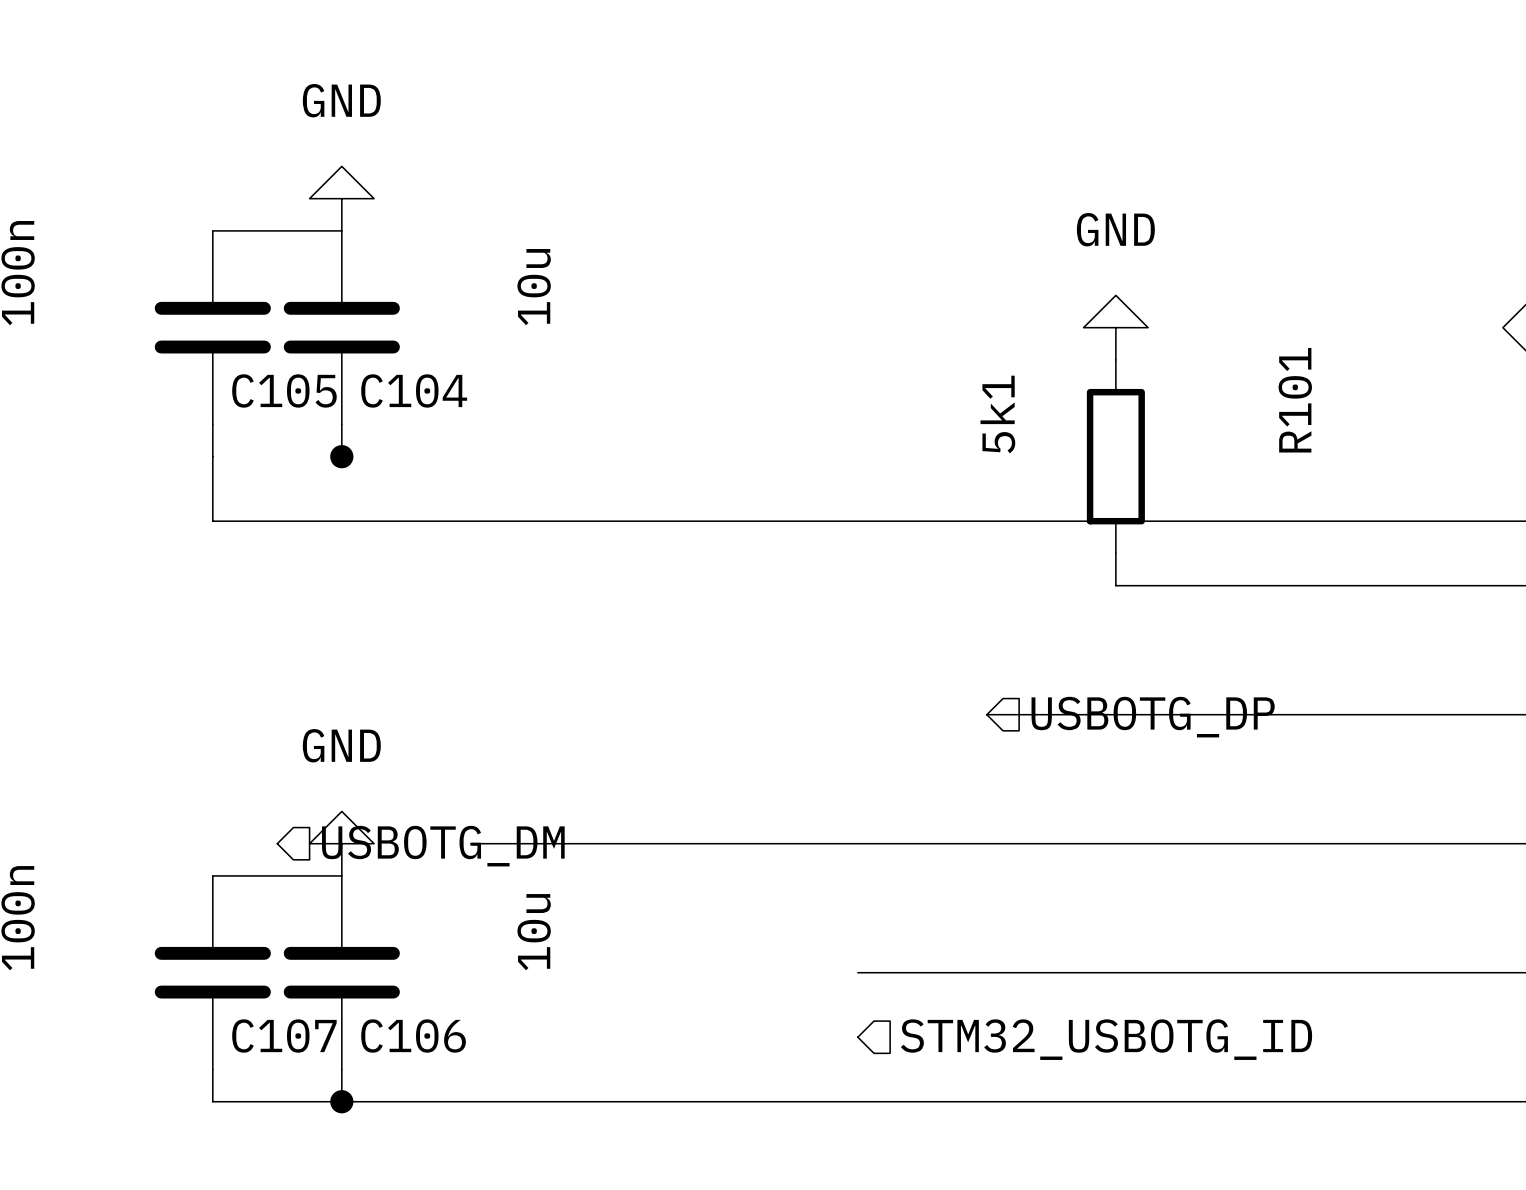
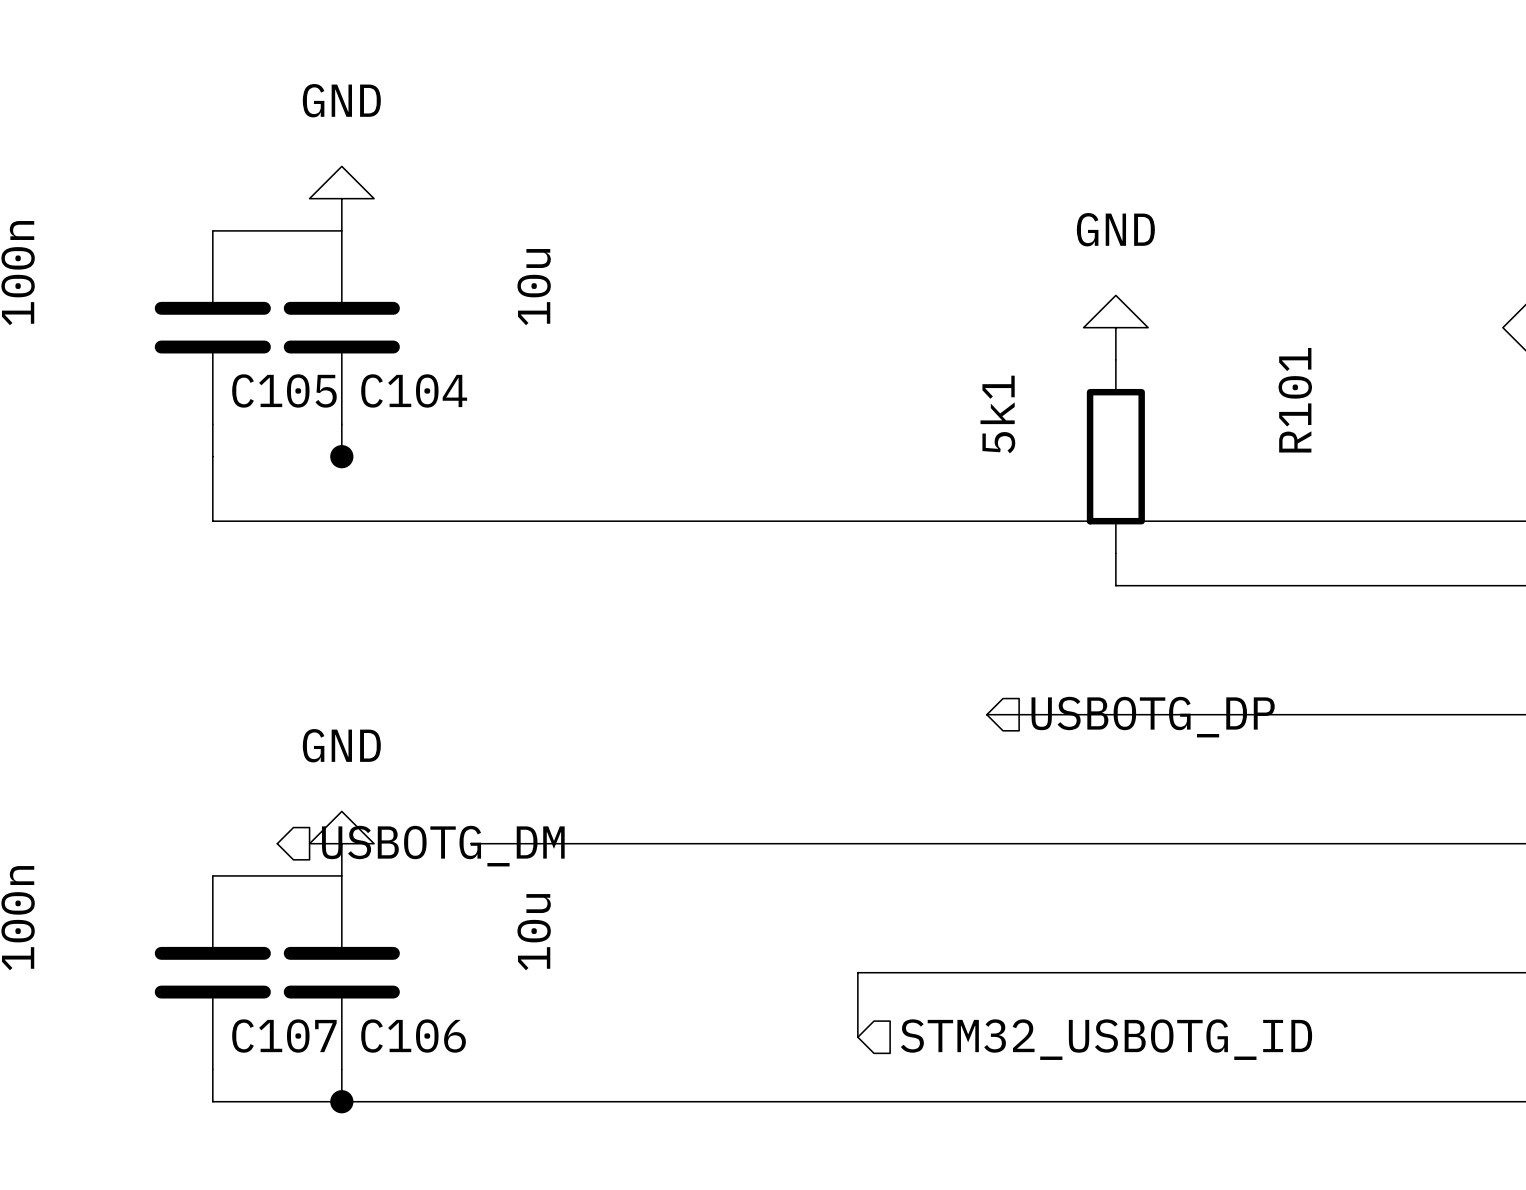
wire: none -> (857, 972) (857, 1037)

